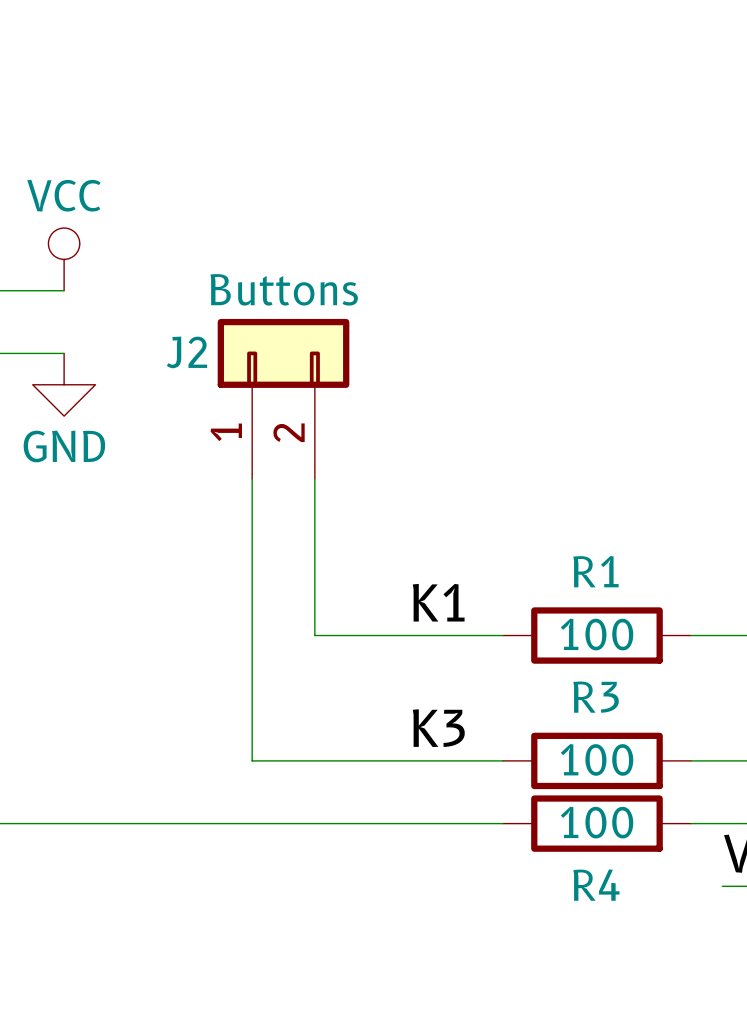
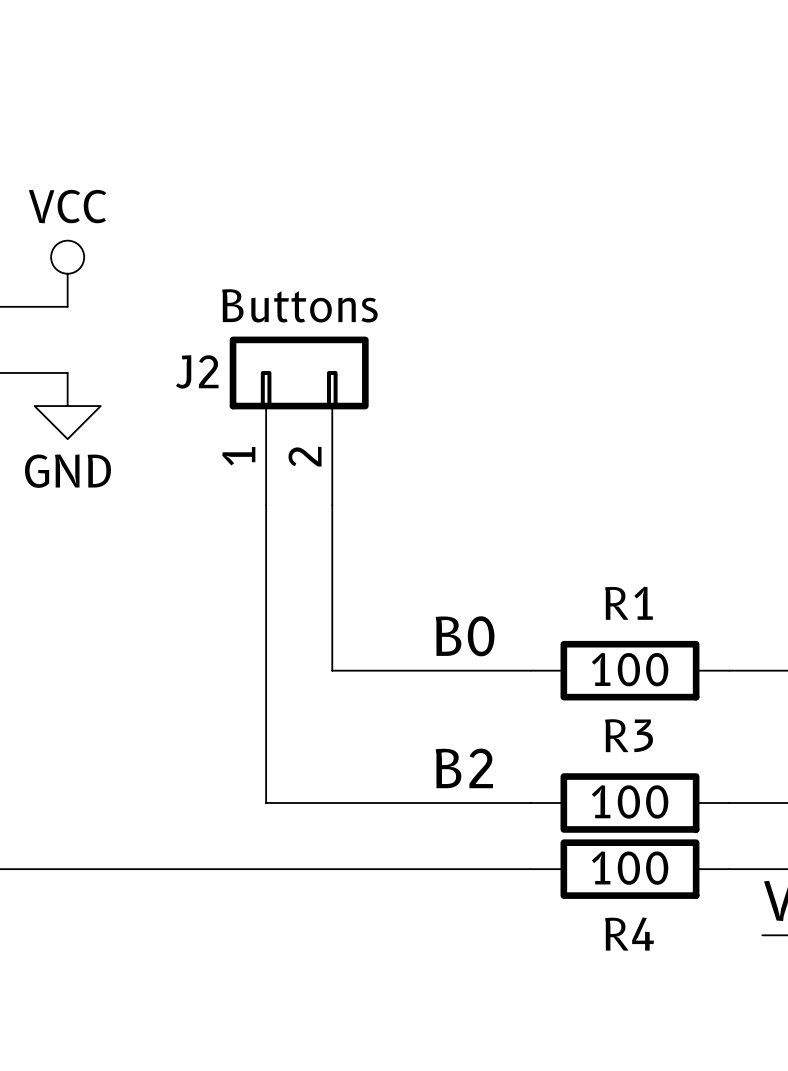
label: K1 (438, 602) -> B0 (465, 636)
label: K3 (438, 728) -> B2 (464, 768)

